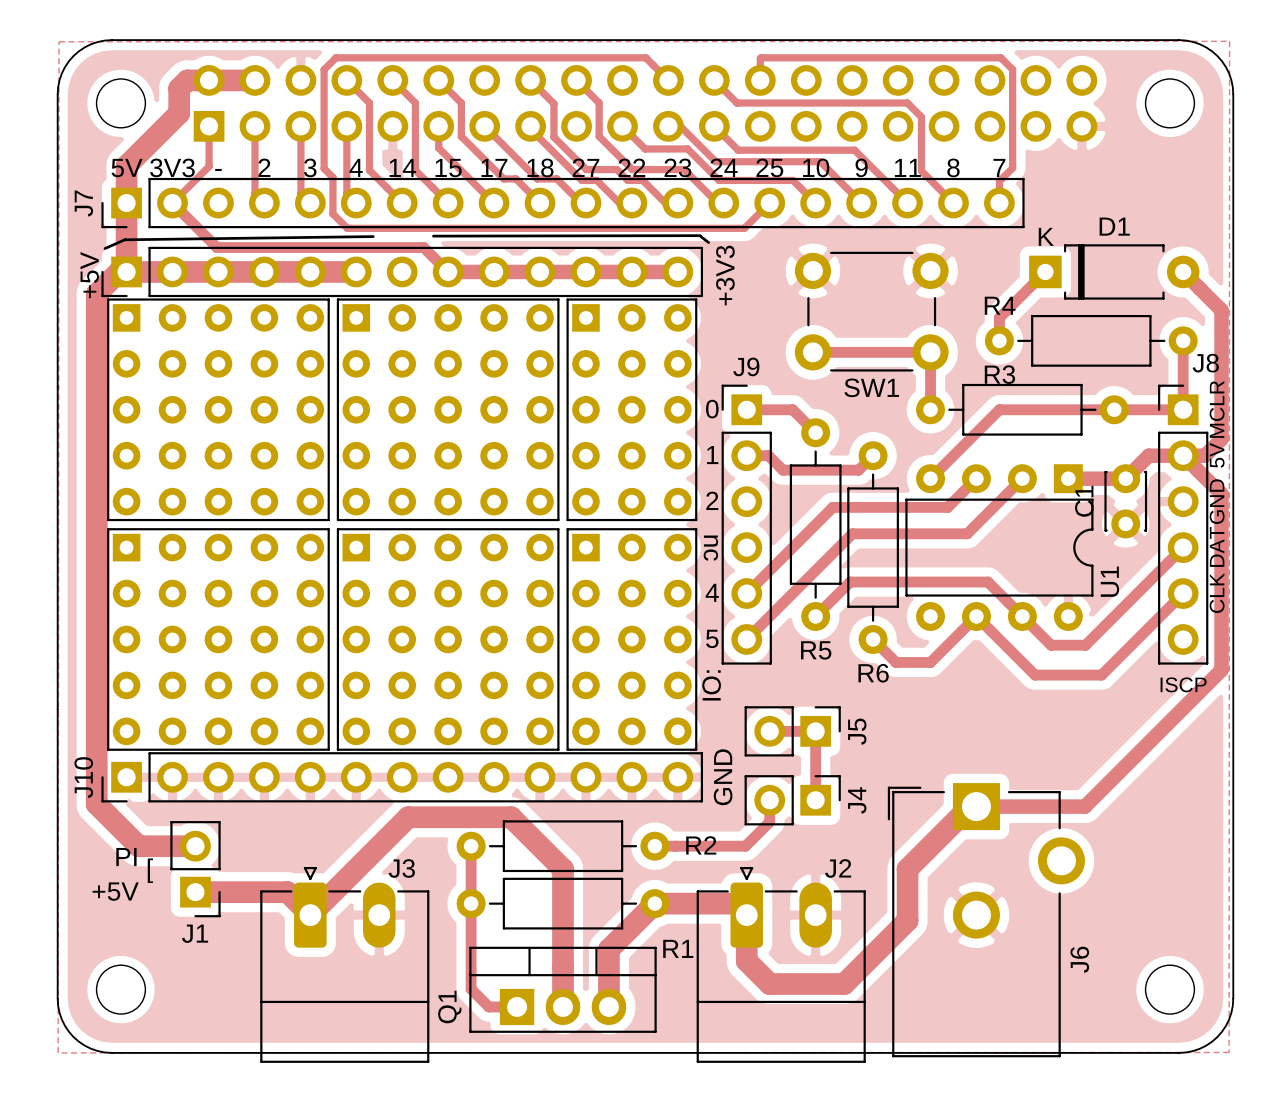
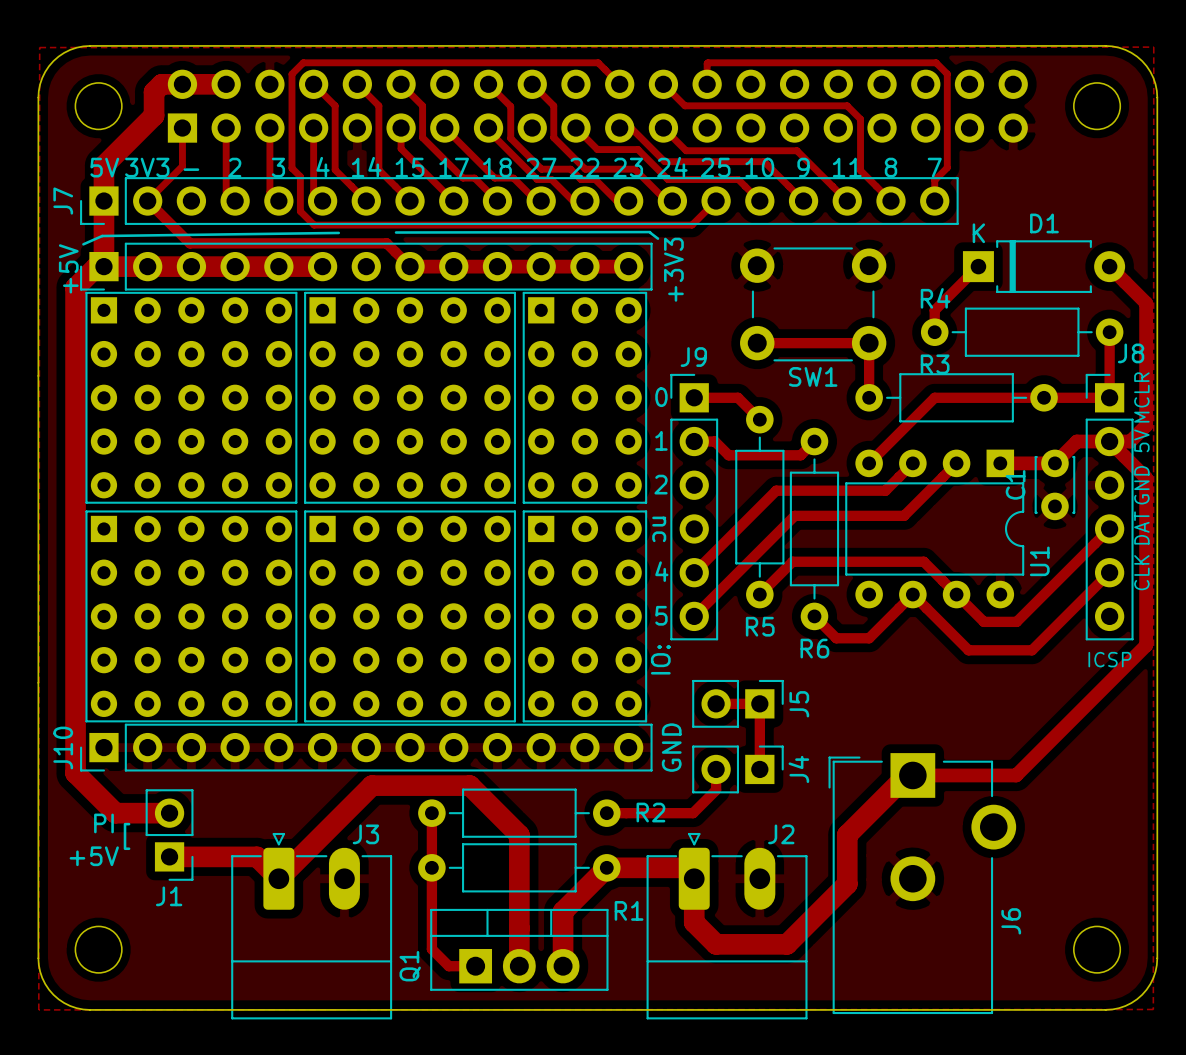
text: ISCP (1183, 684) -> ICSP (1109, 659)

